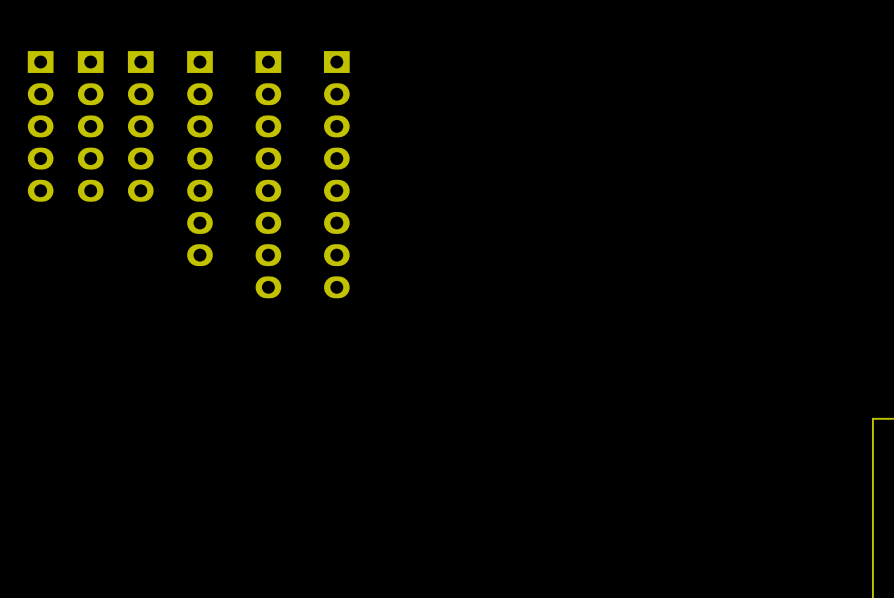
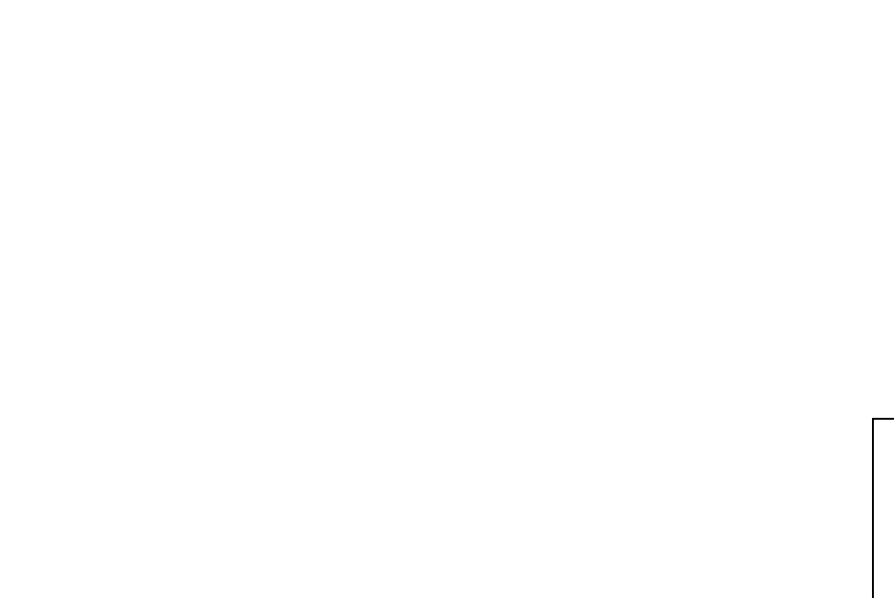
part: (40, 126) -> none
part: (90, 126) -> none
part: (140, 126) -> none
part: (199, 158) -> none
part: (268, 174) -> none
part: (336, 174) -> none

